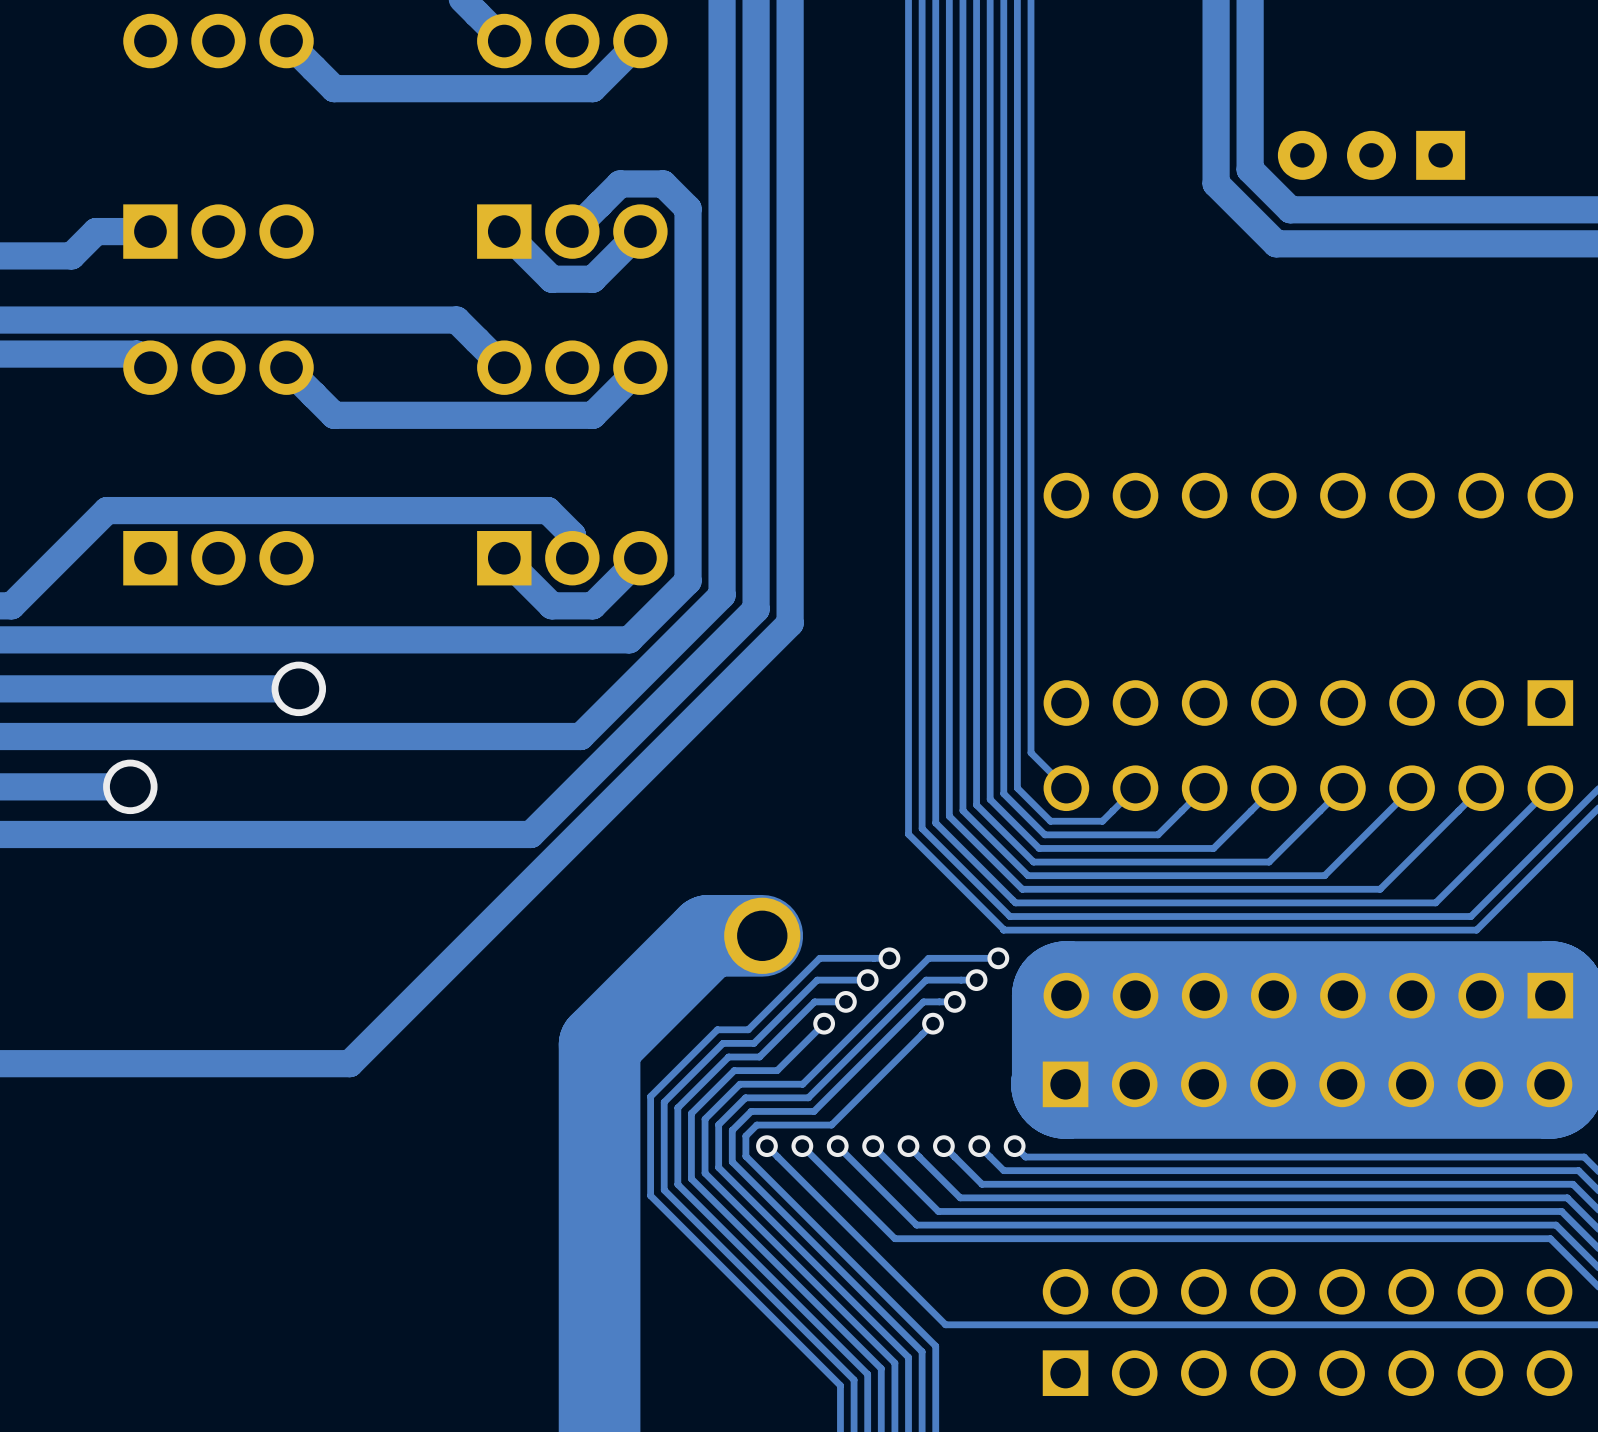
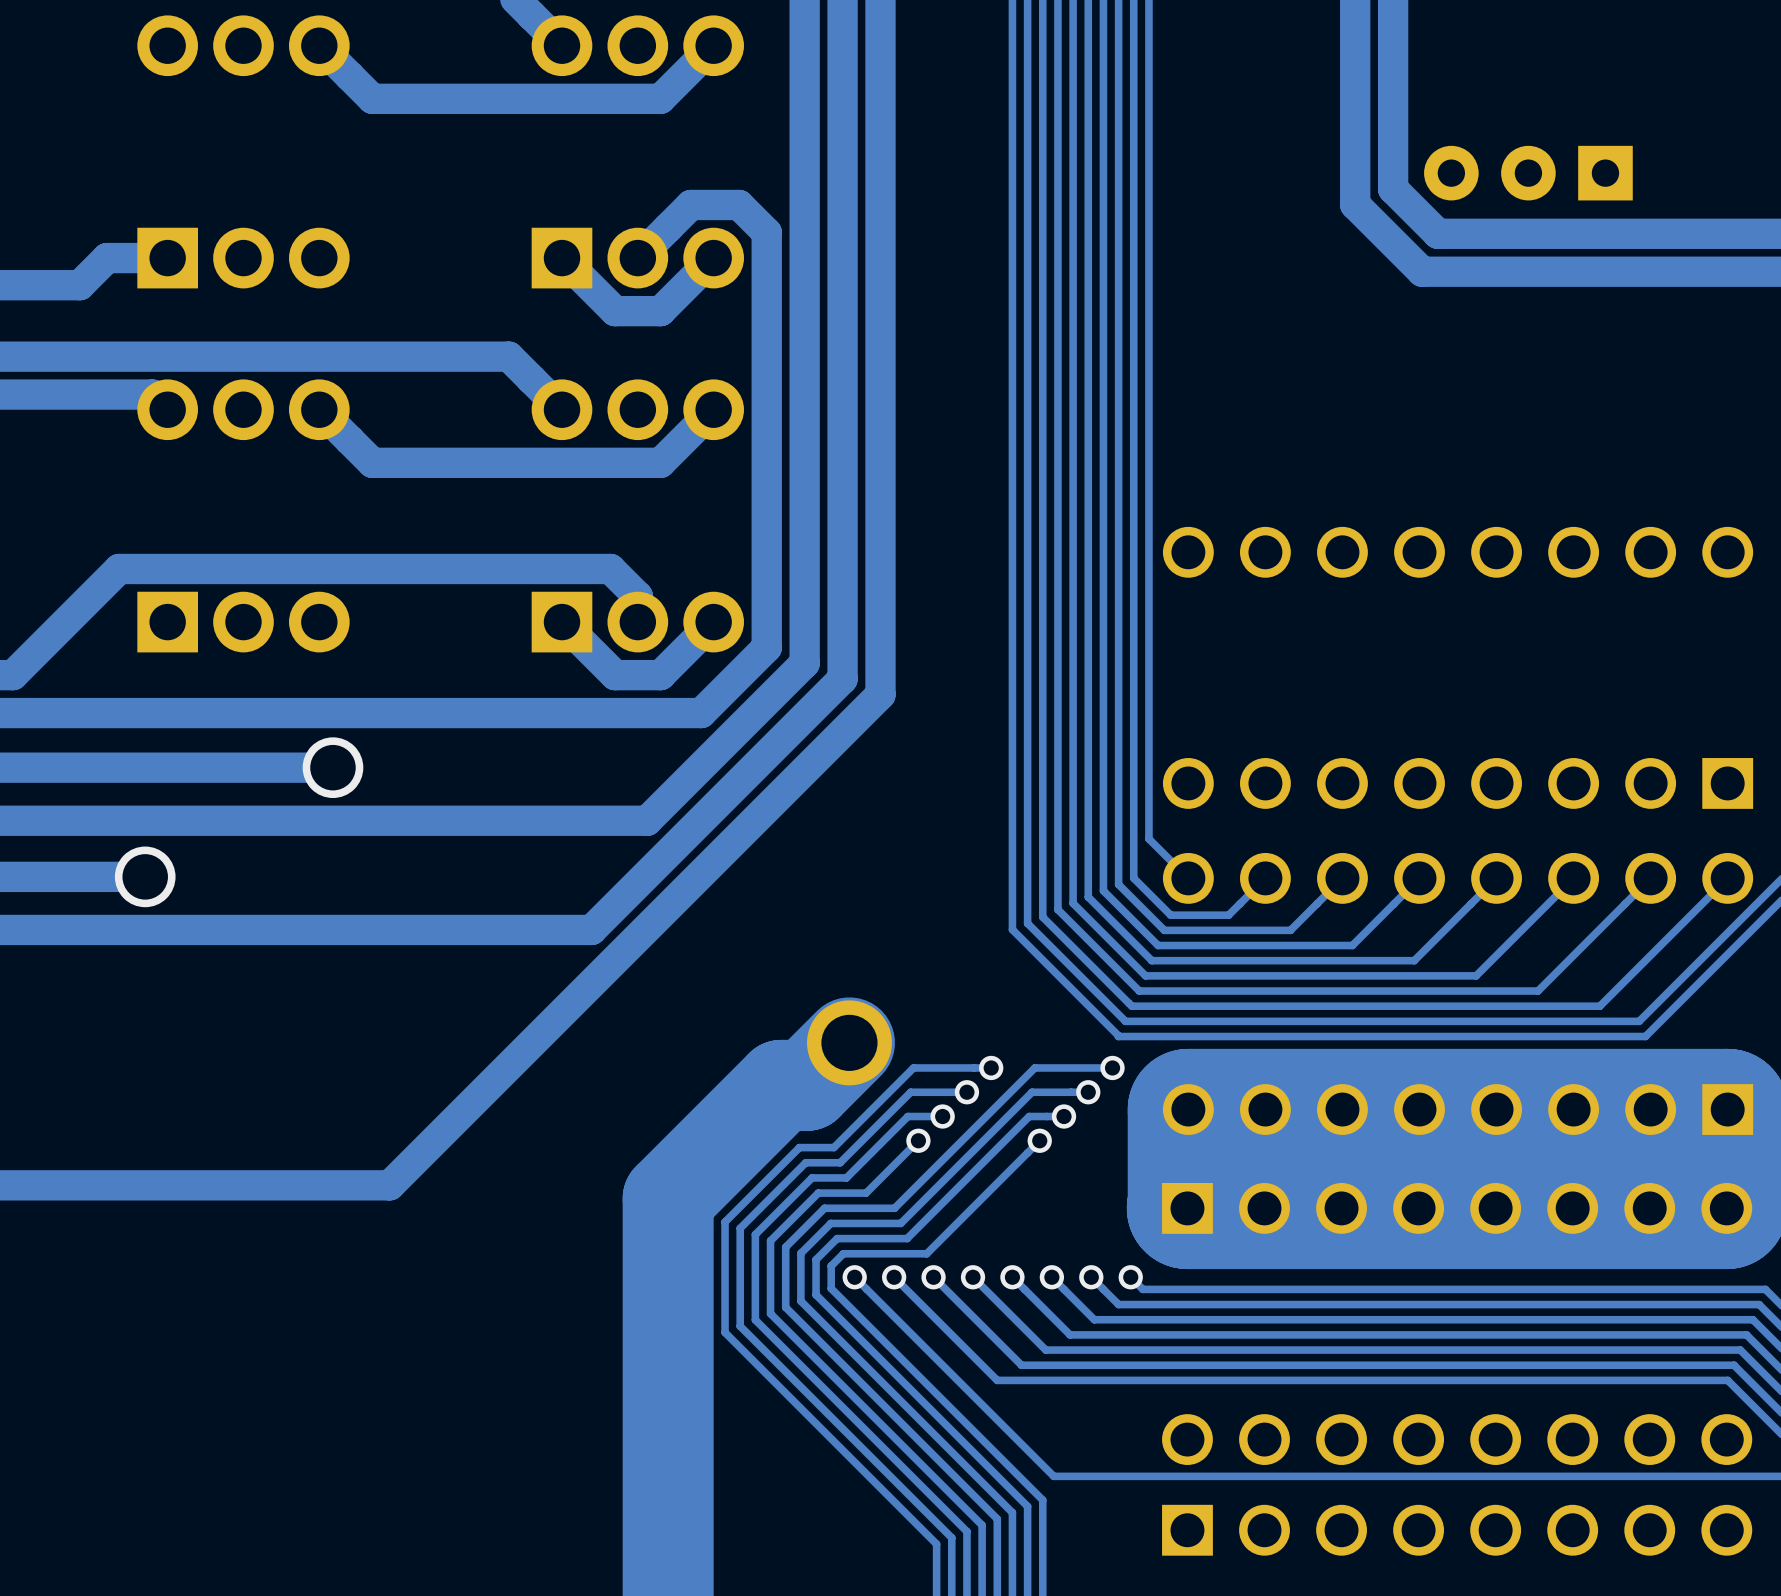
track: (762, 935) (708, 935) (599, 1044) (599, 1075) -> (849, 1042) (807, 1085) (781, 1085) (668, 1198)

